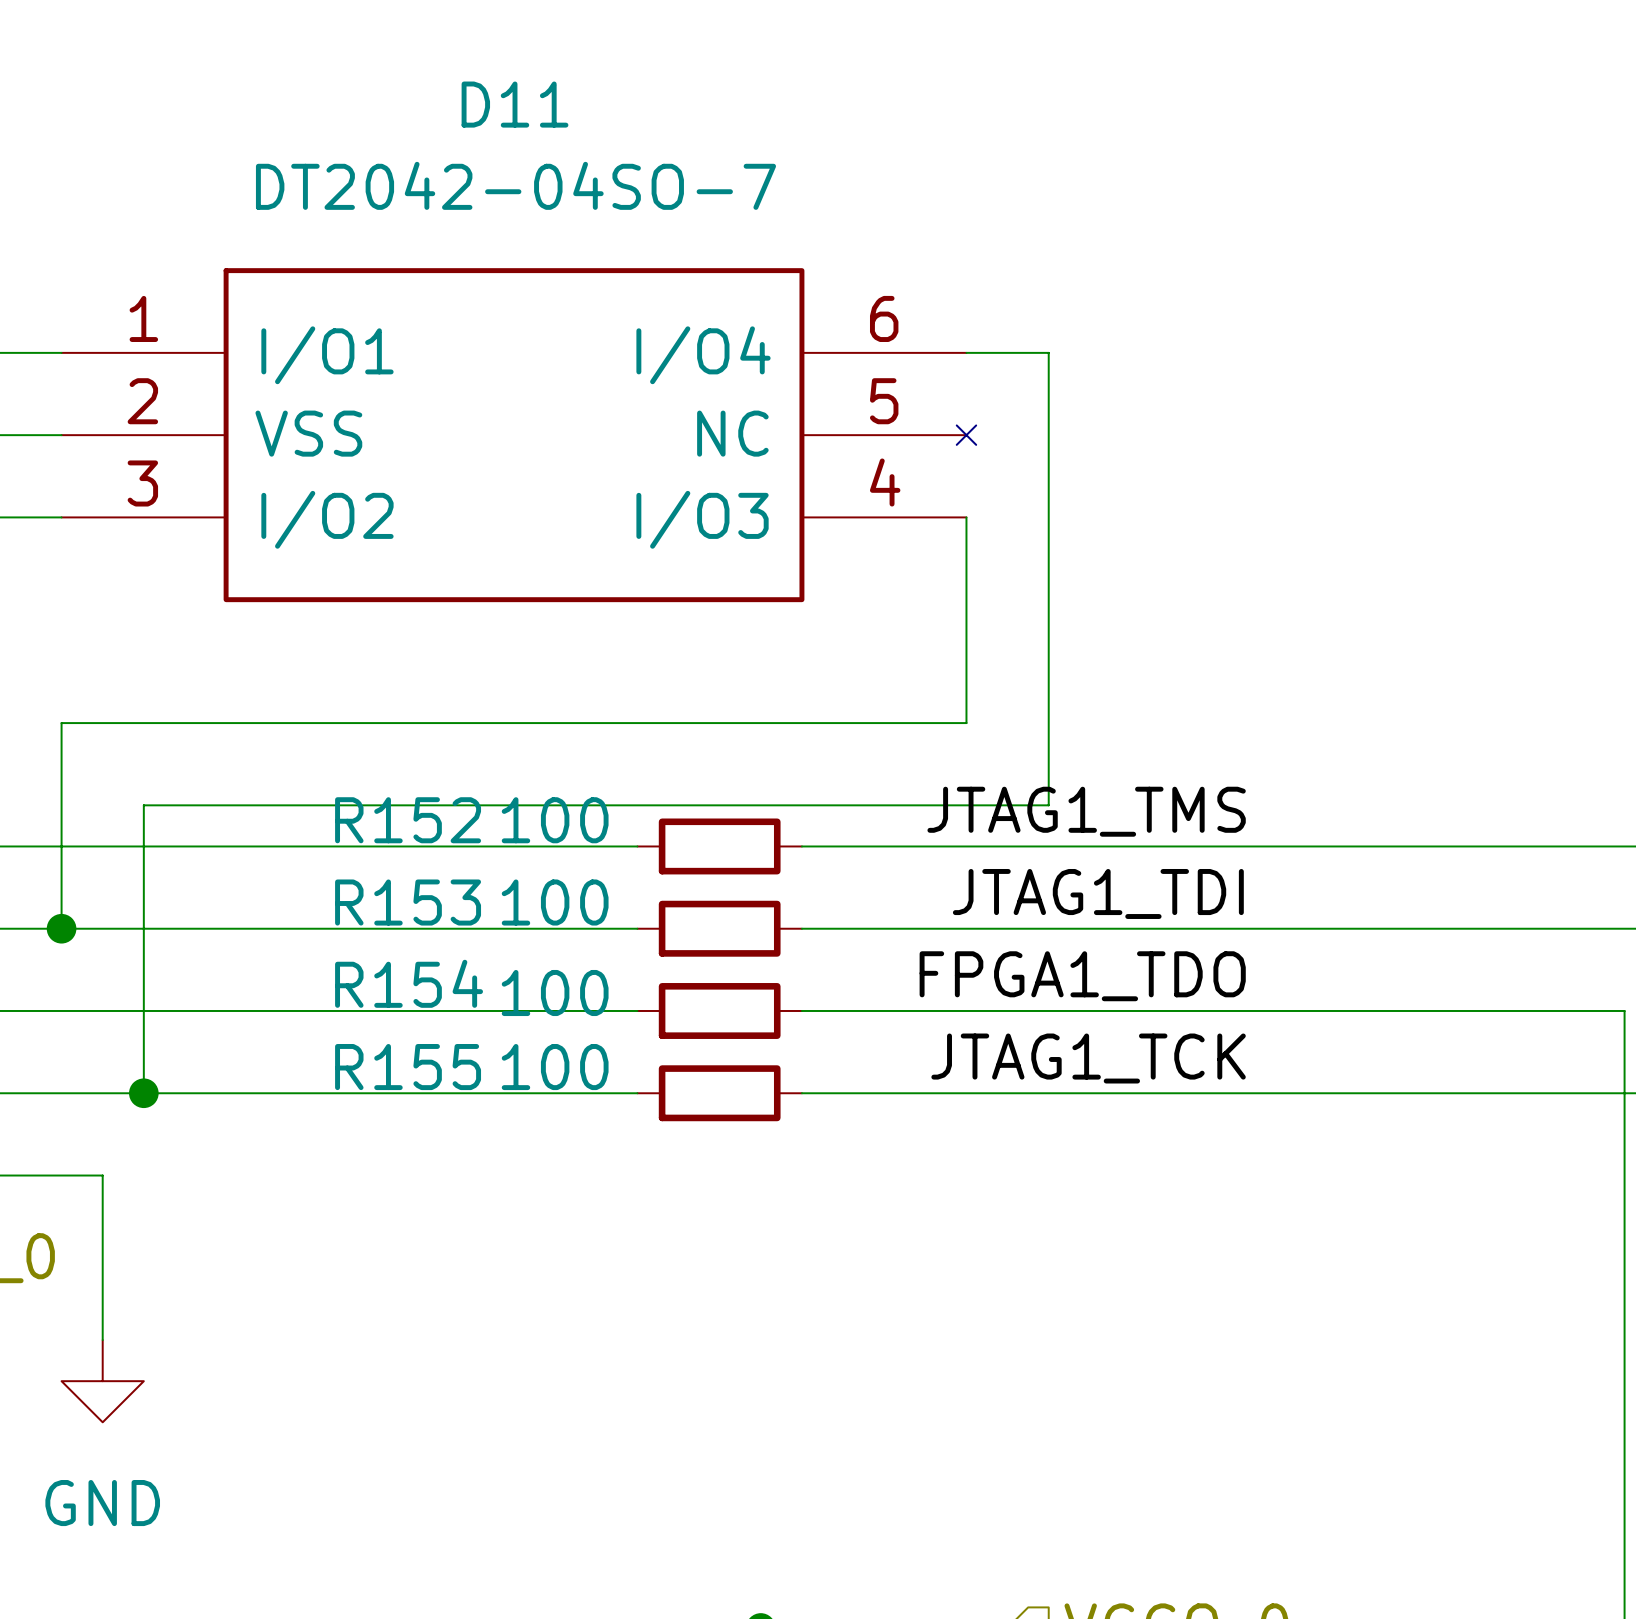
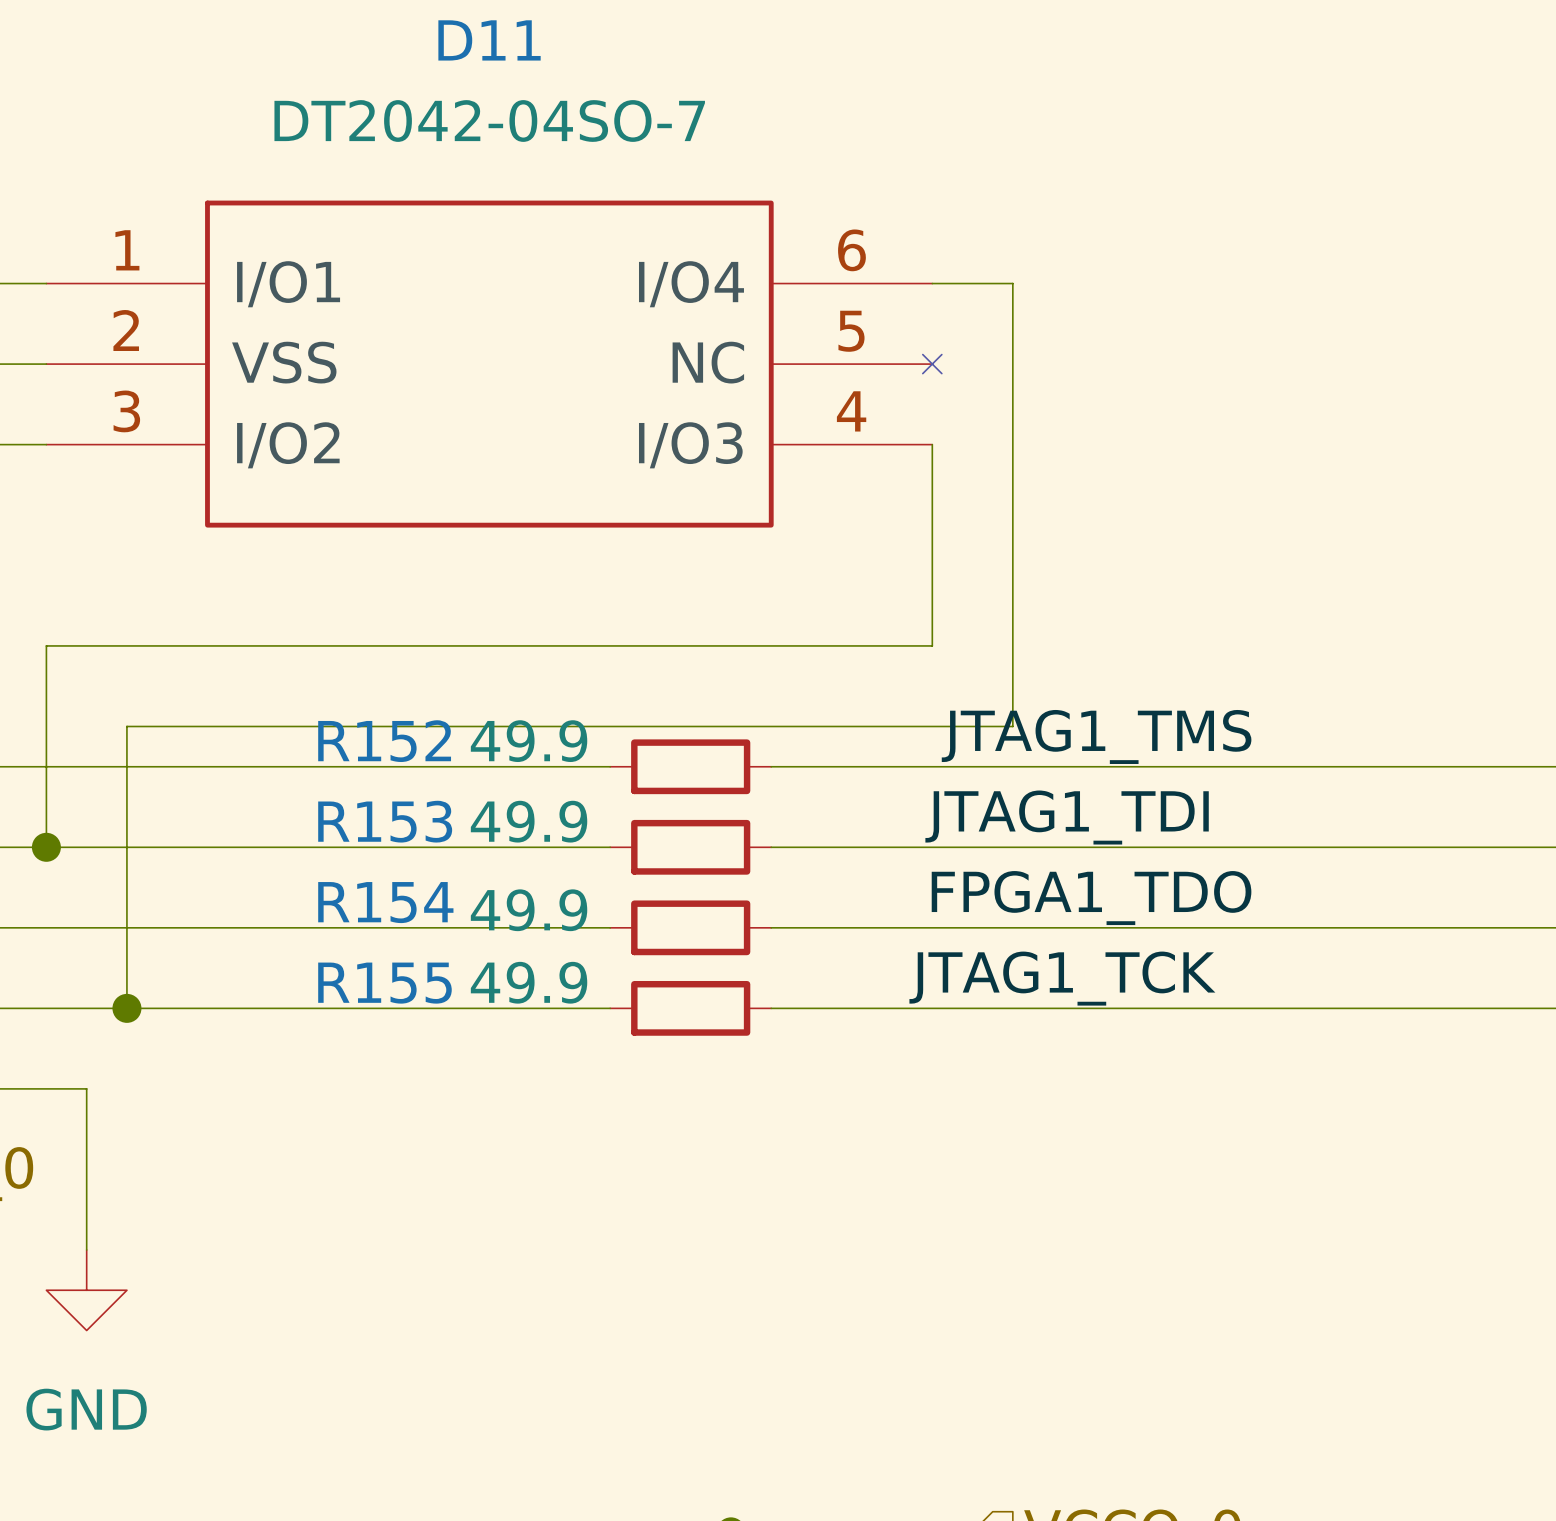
label position: JTAG1_TMS (1086, 811) -> JTAG1_TMS (1096, 736)
R152 value: 100 (555, 820) -> 49.9 (529, 741)
R153 value: 100 (555, 902) -> 49.9 (529, 821)
label position: FPGA1_TDO (1082, 976) -> FPGA1_TDO (1091, 898)
R154 value: 100 (555, 993) -> 49.9 (529, 910)
R155 value: 100 (555, 1067) -> 49.9 (529, 982)

